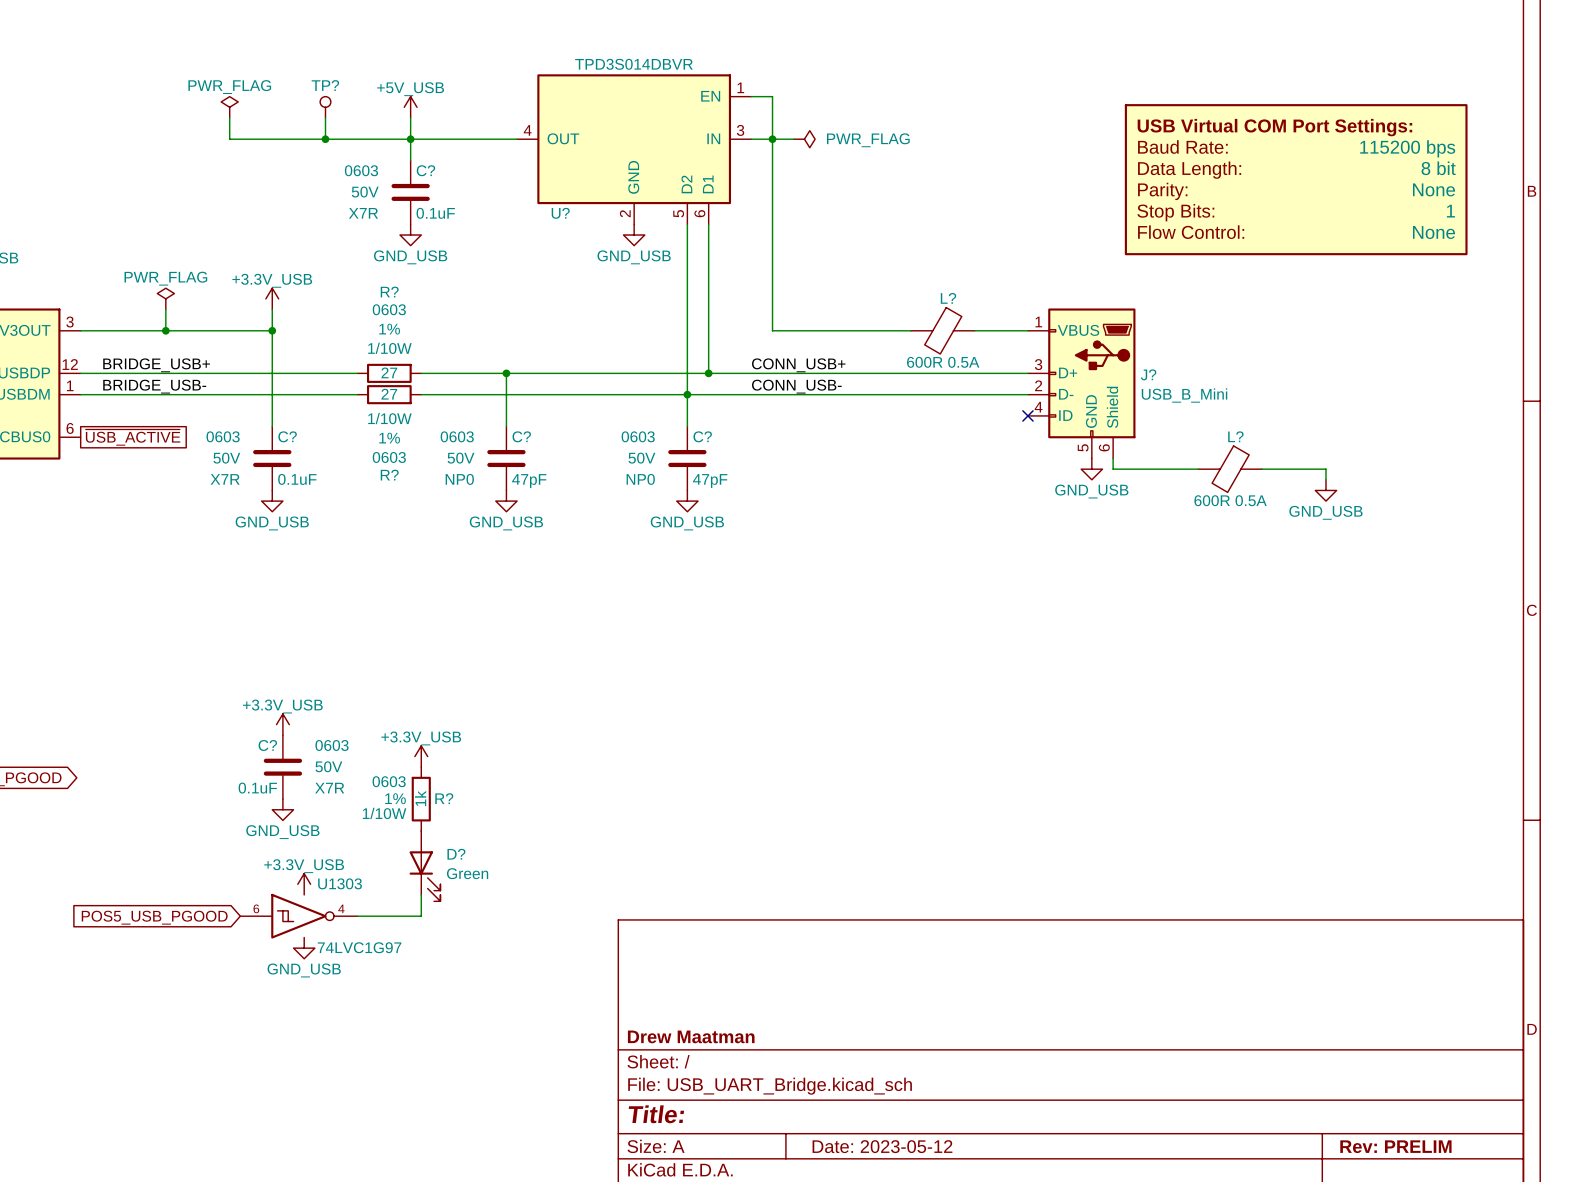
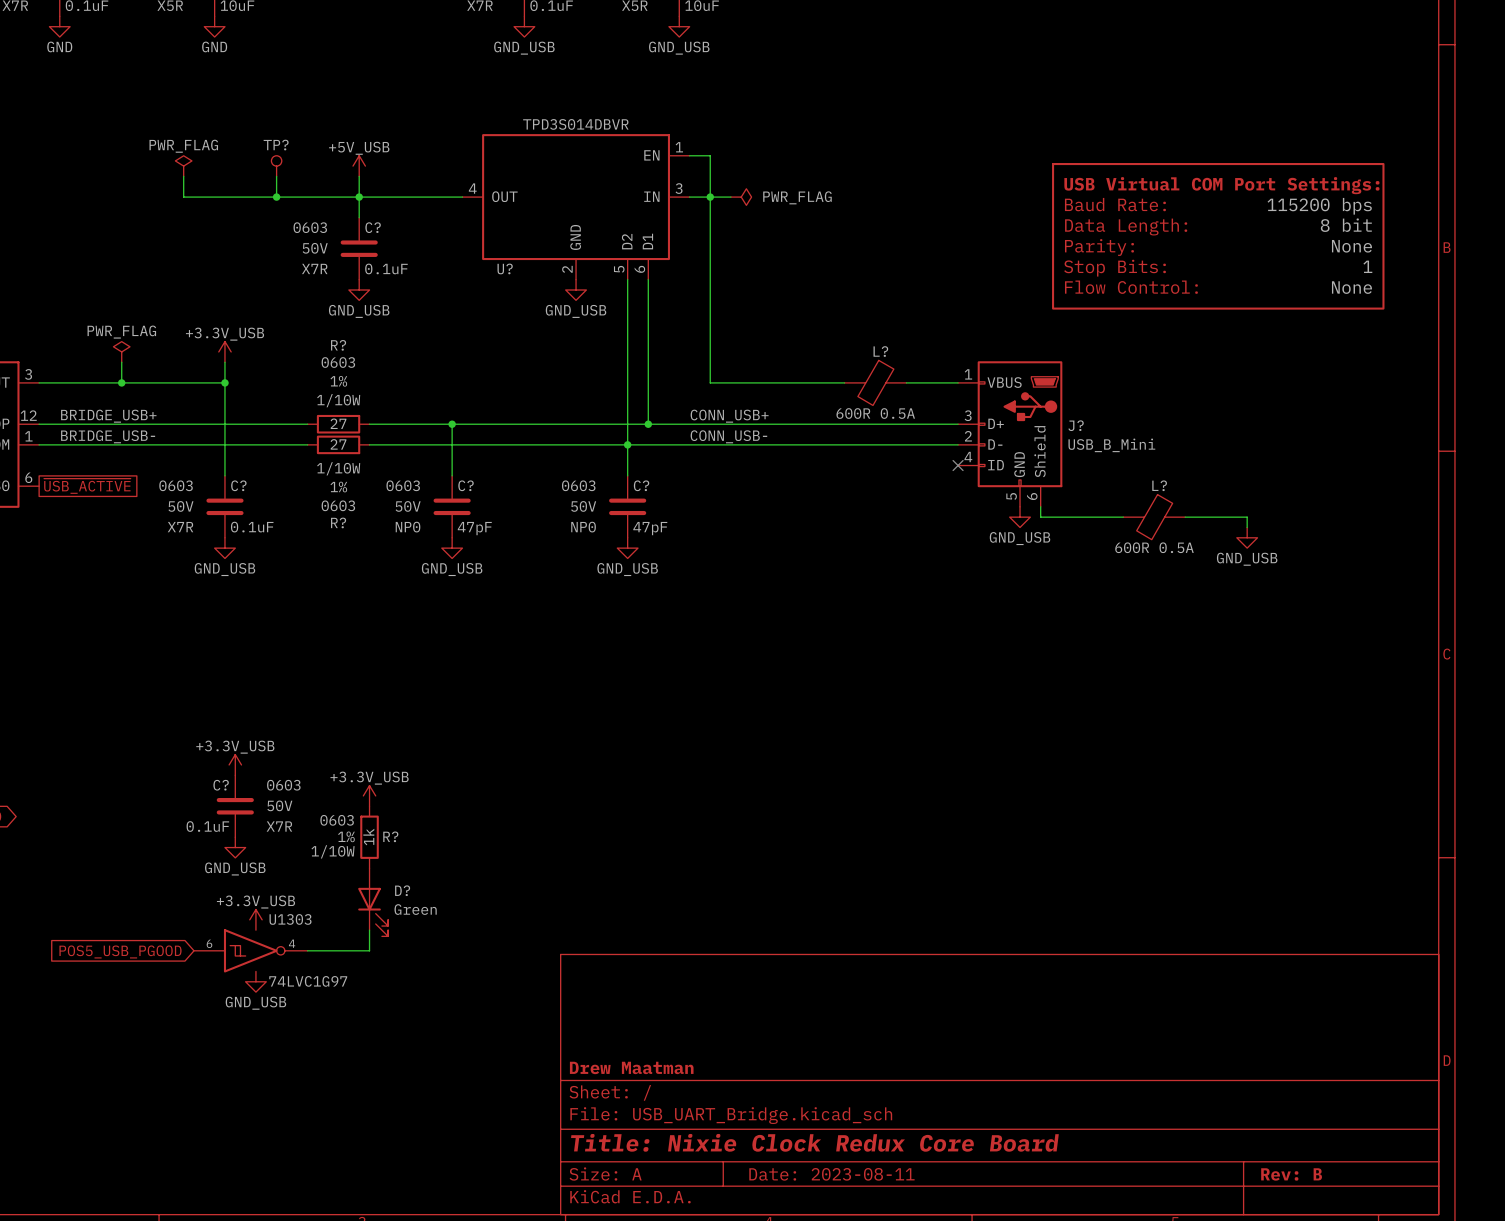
title block: Title: (656, 1114) -> Title: Nixie Clock Redux Core Board (814, 1142)
title block: Date: 2023-05-12 (882, 1146) -> Date: 2023-08-11 (831, 1174)
title block: Rev: PRELIM (1395, 1146) -> Rev: B (1291, 1174)

